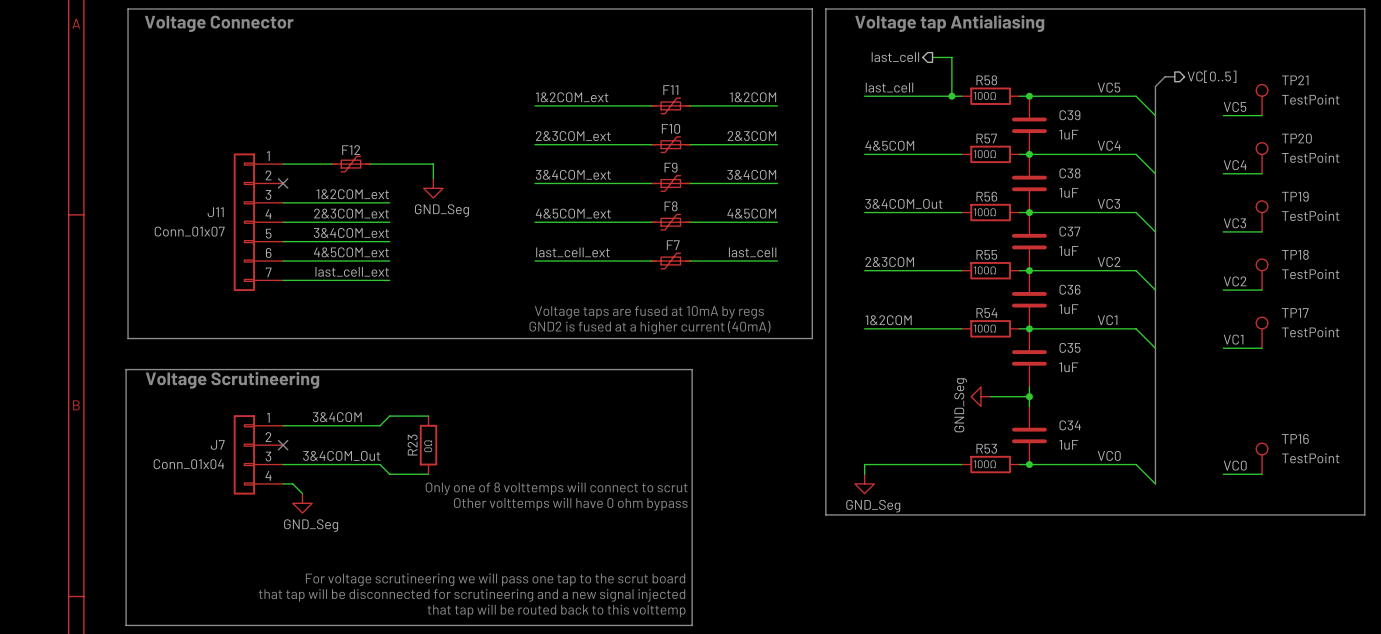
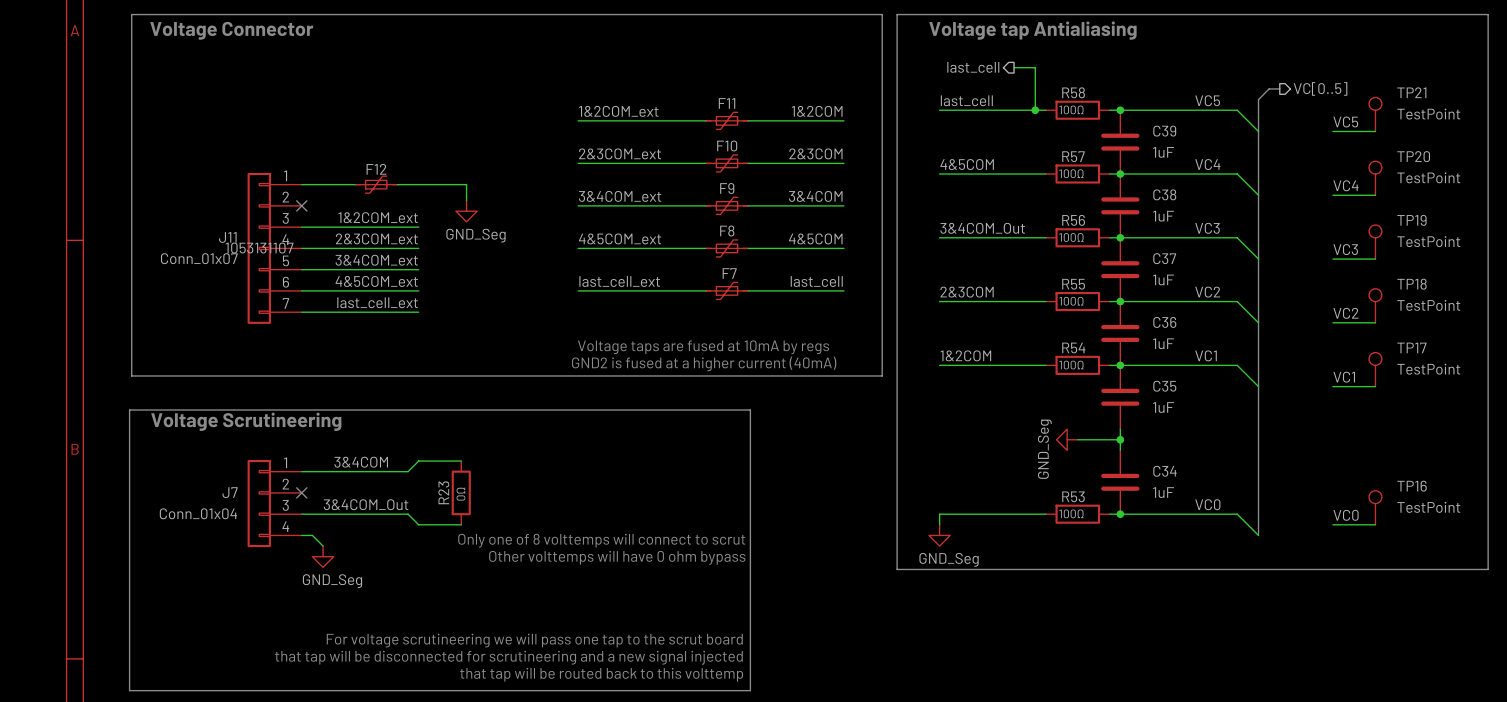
J11 text: none -> 1053131107 (259, 248)

